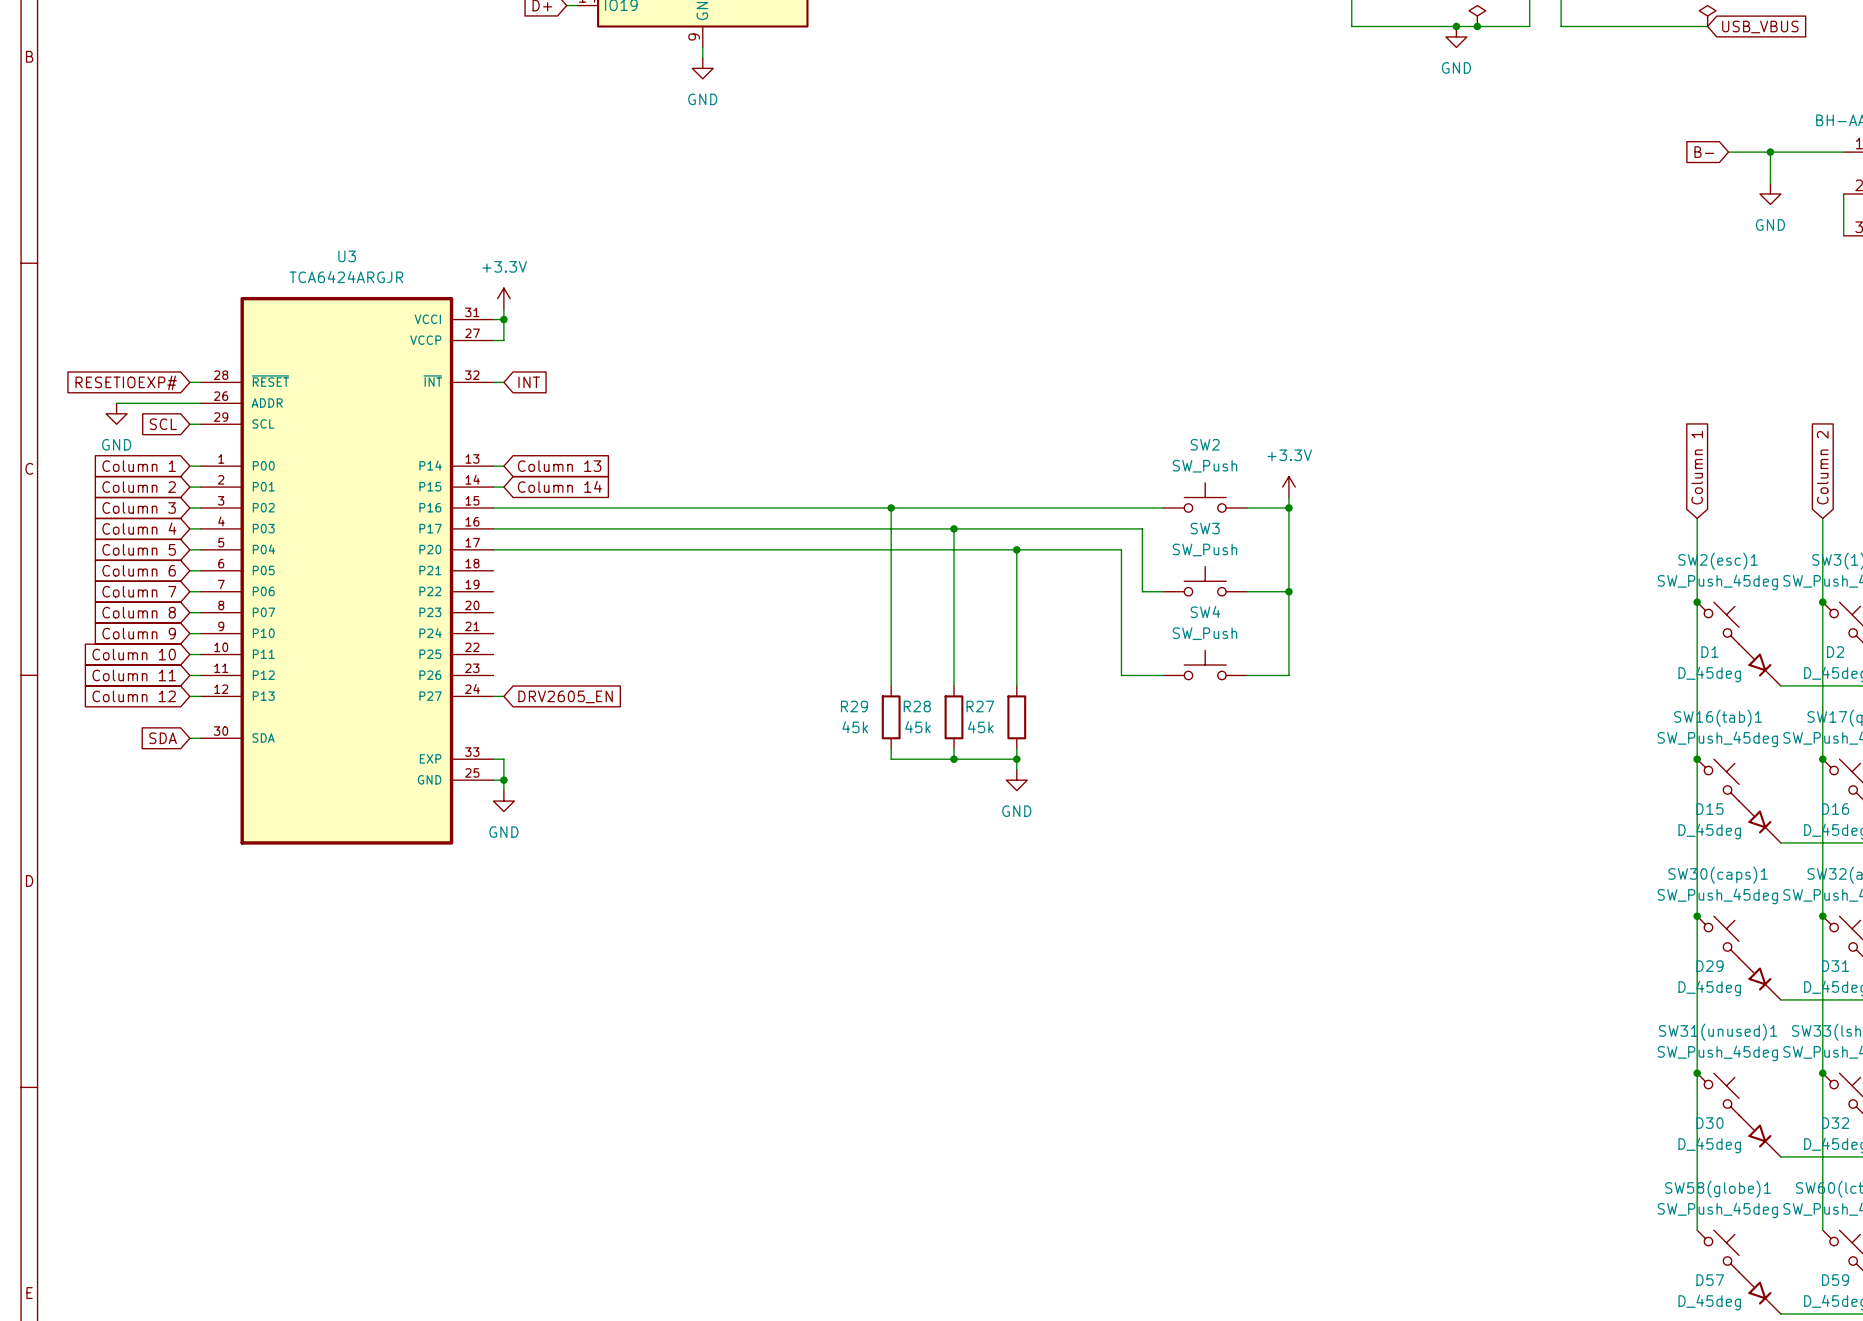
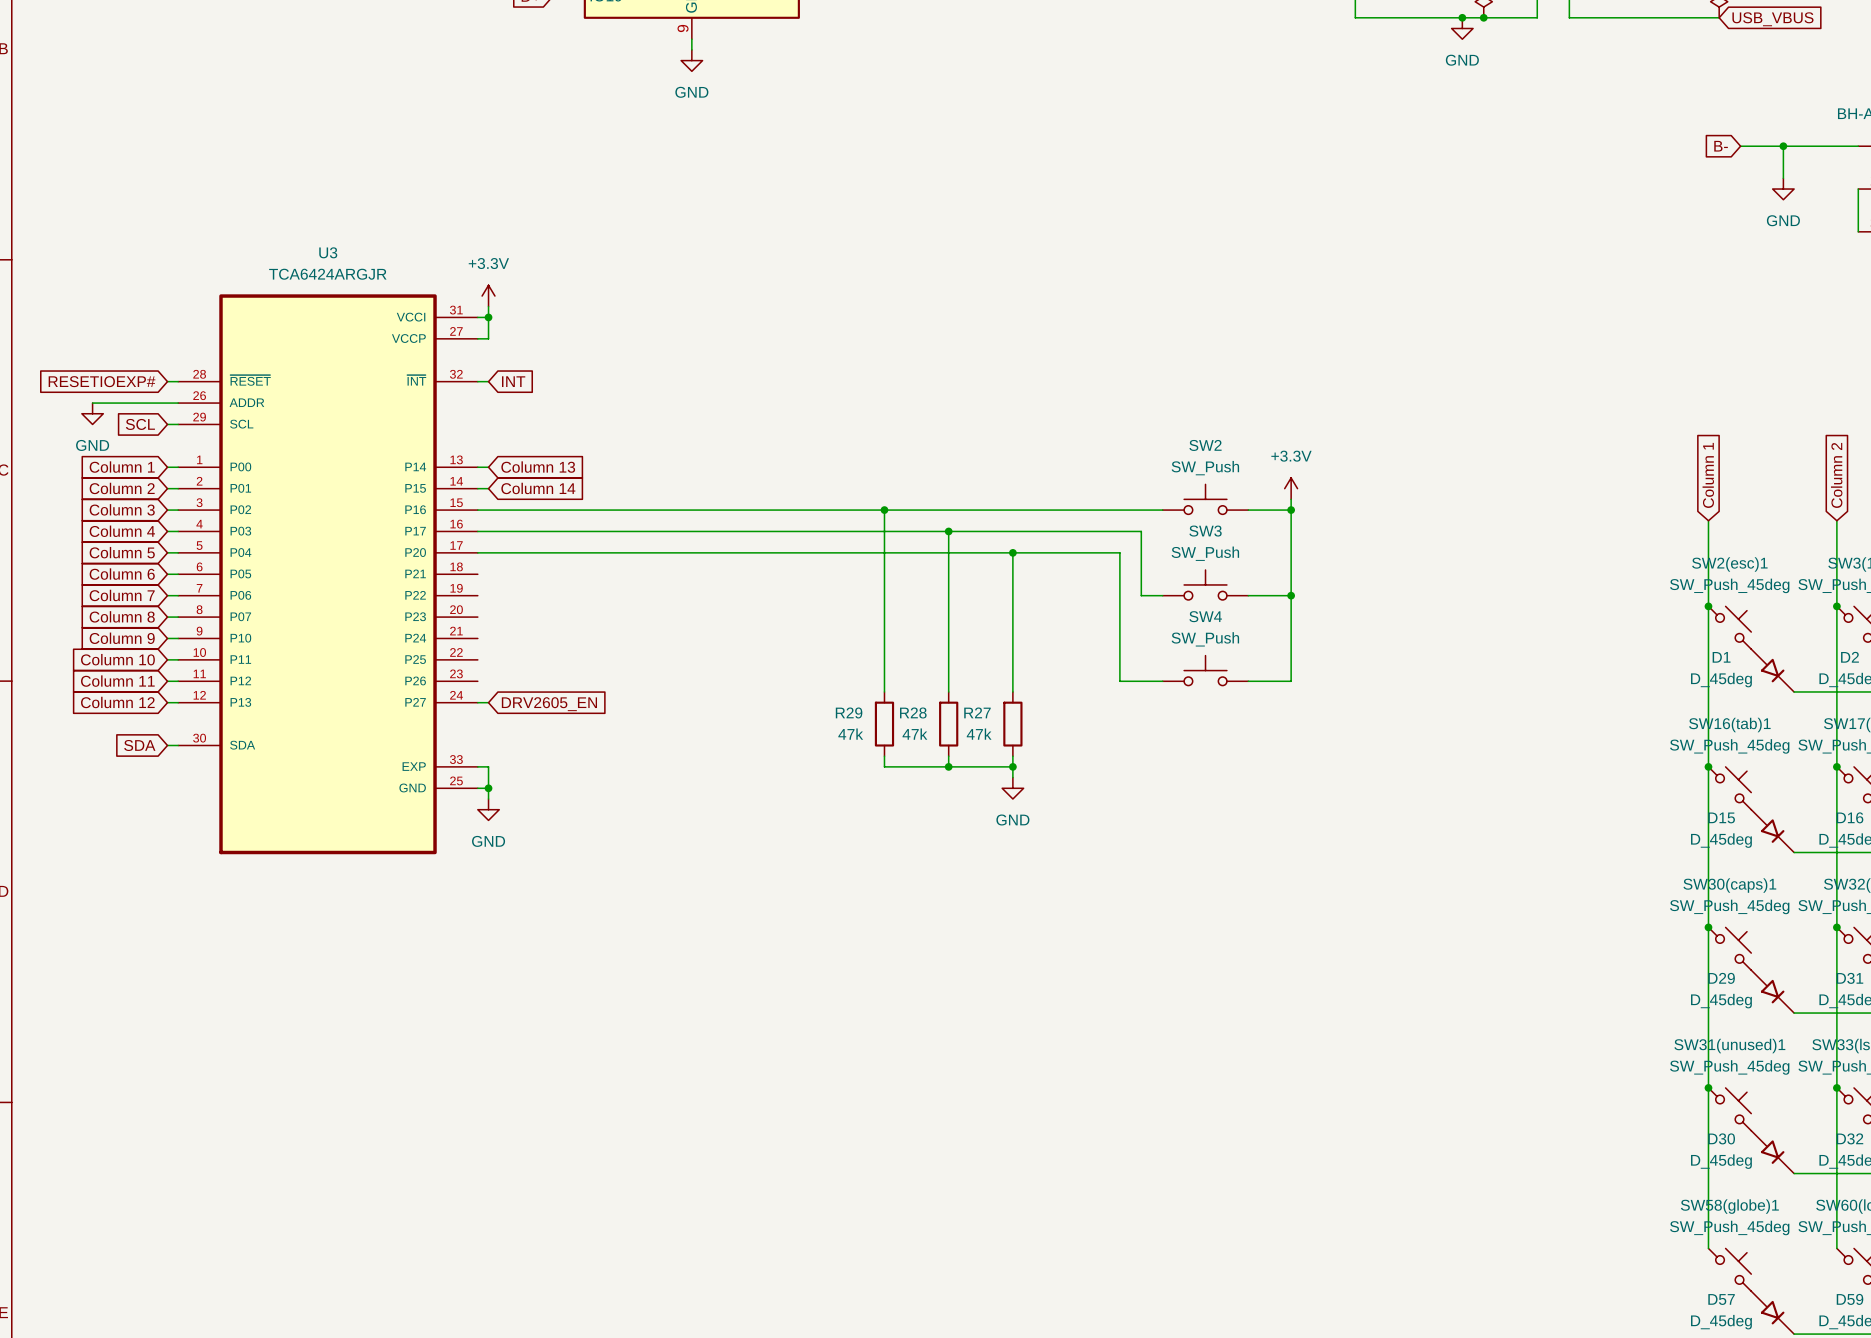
R29 value: 45k (855, 727) -> 47k (850, 734)
R28 value: 45k (918, 727) -> 47k (914, 734)
R27 value: 45k (980, 727) -> 47k (979, 734)

